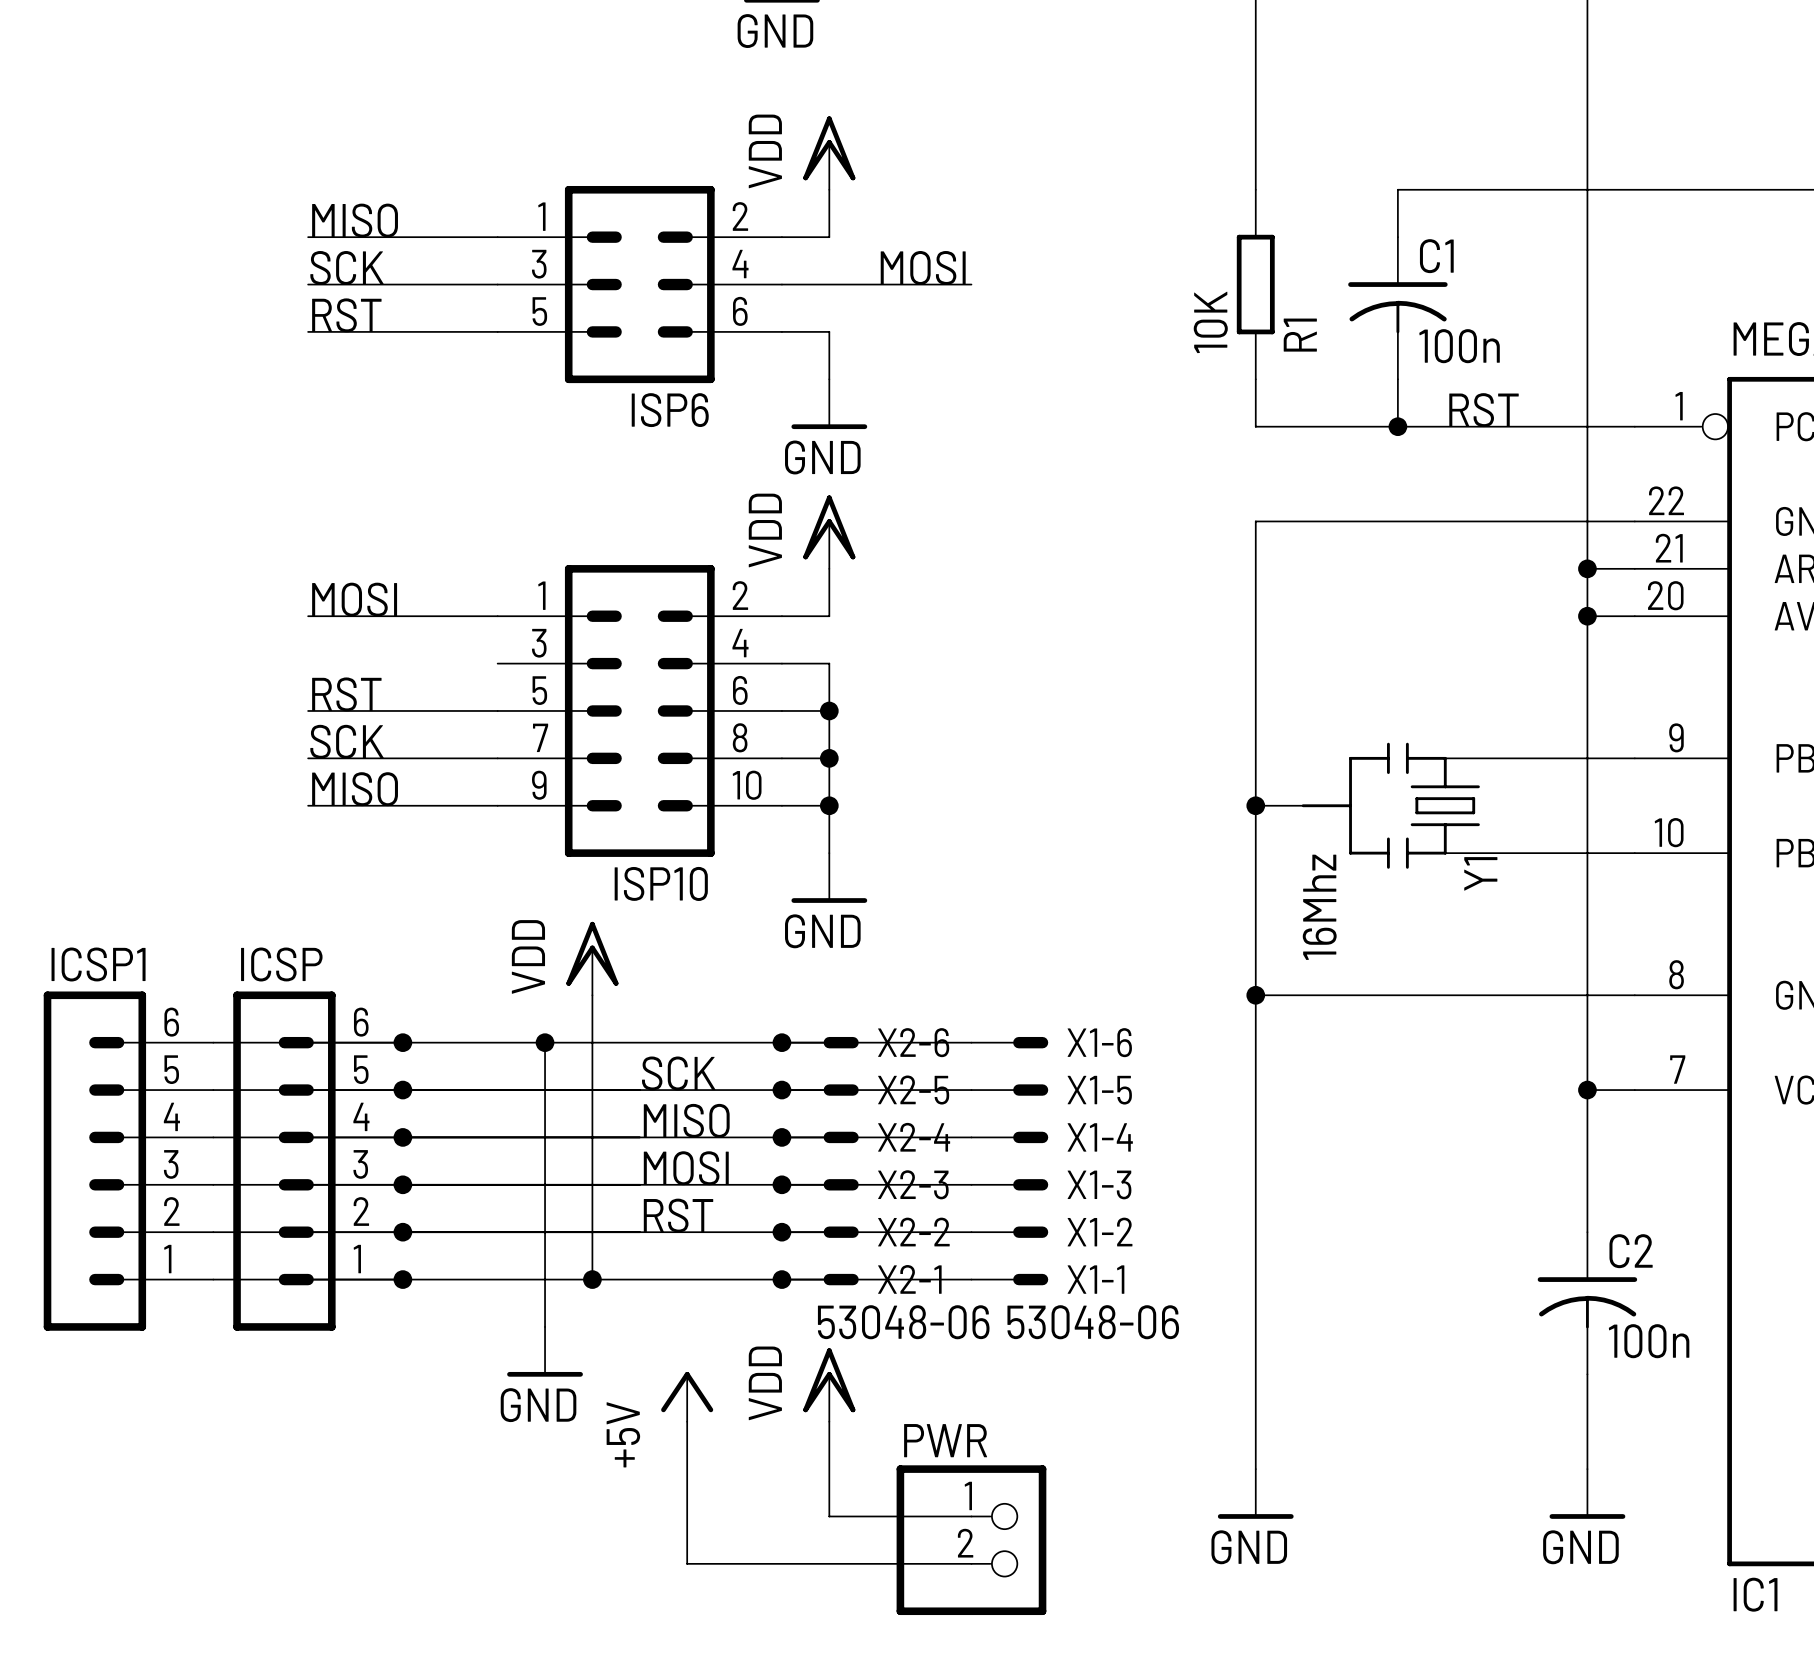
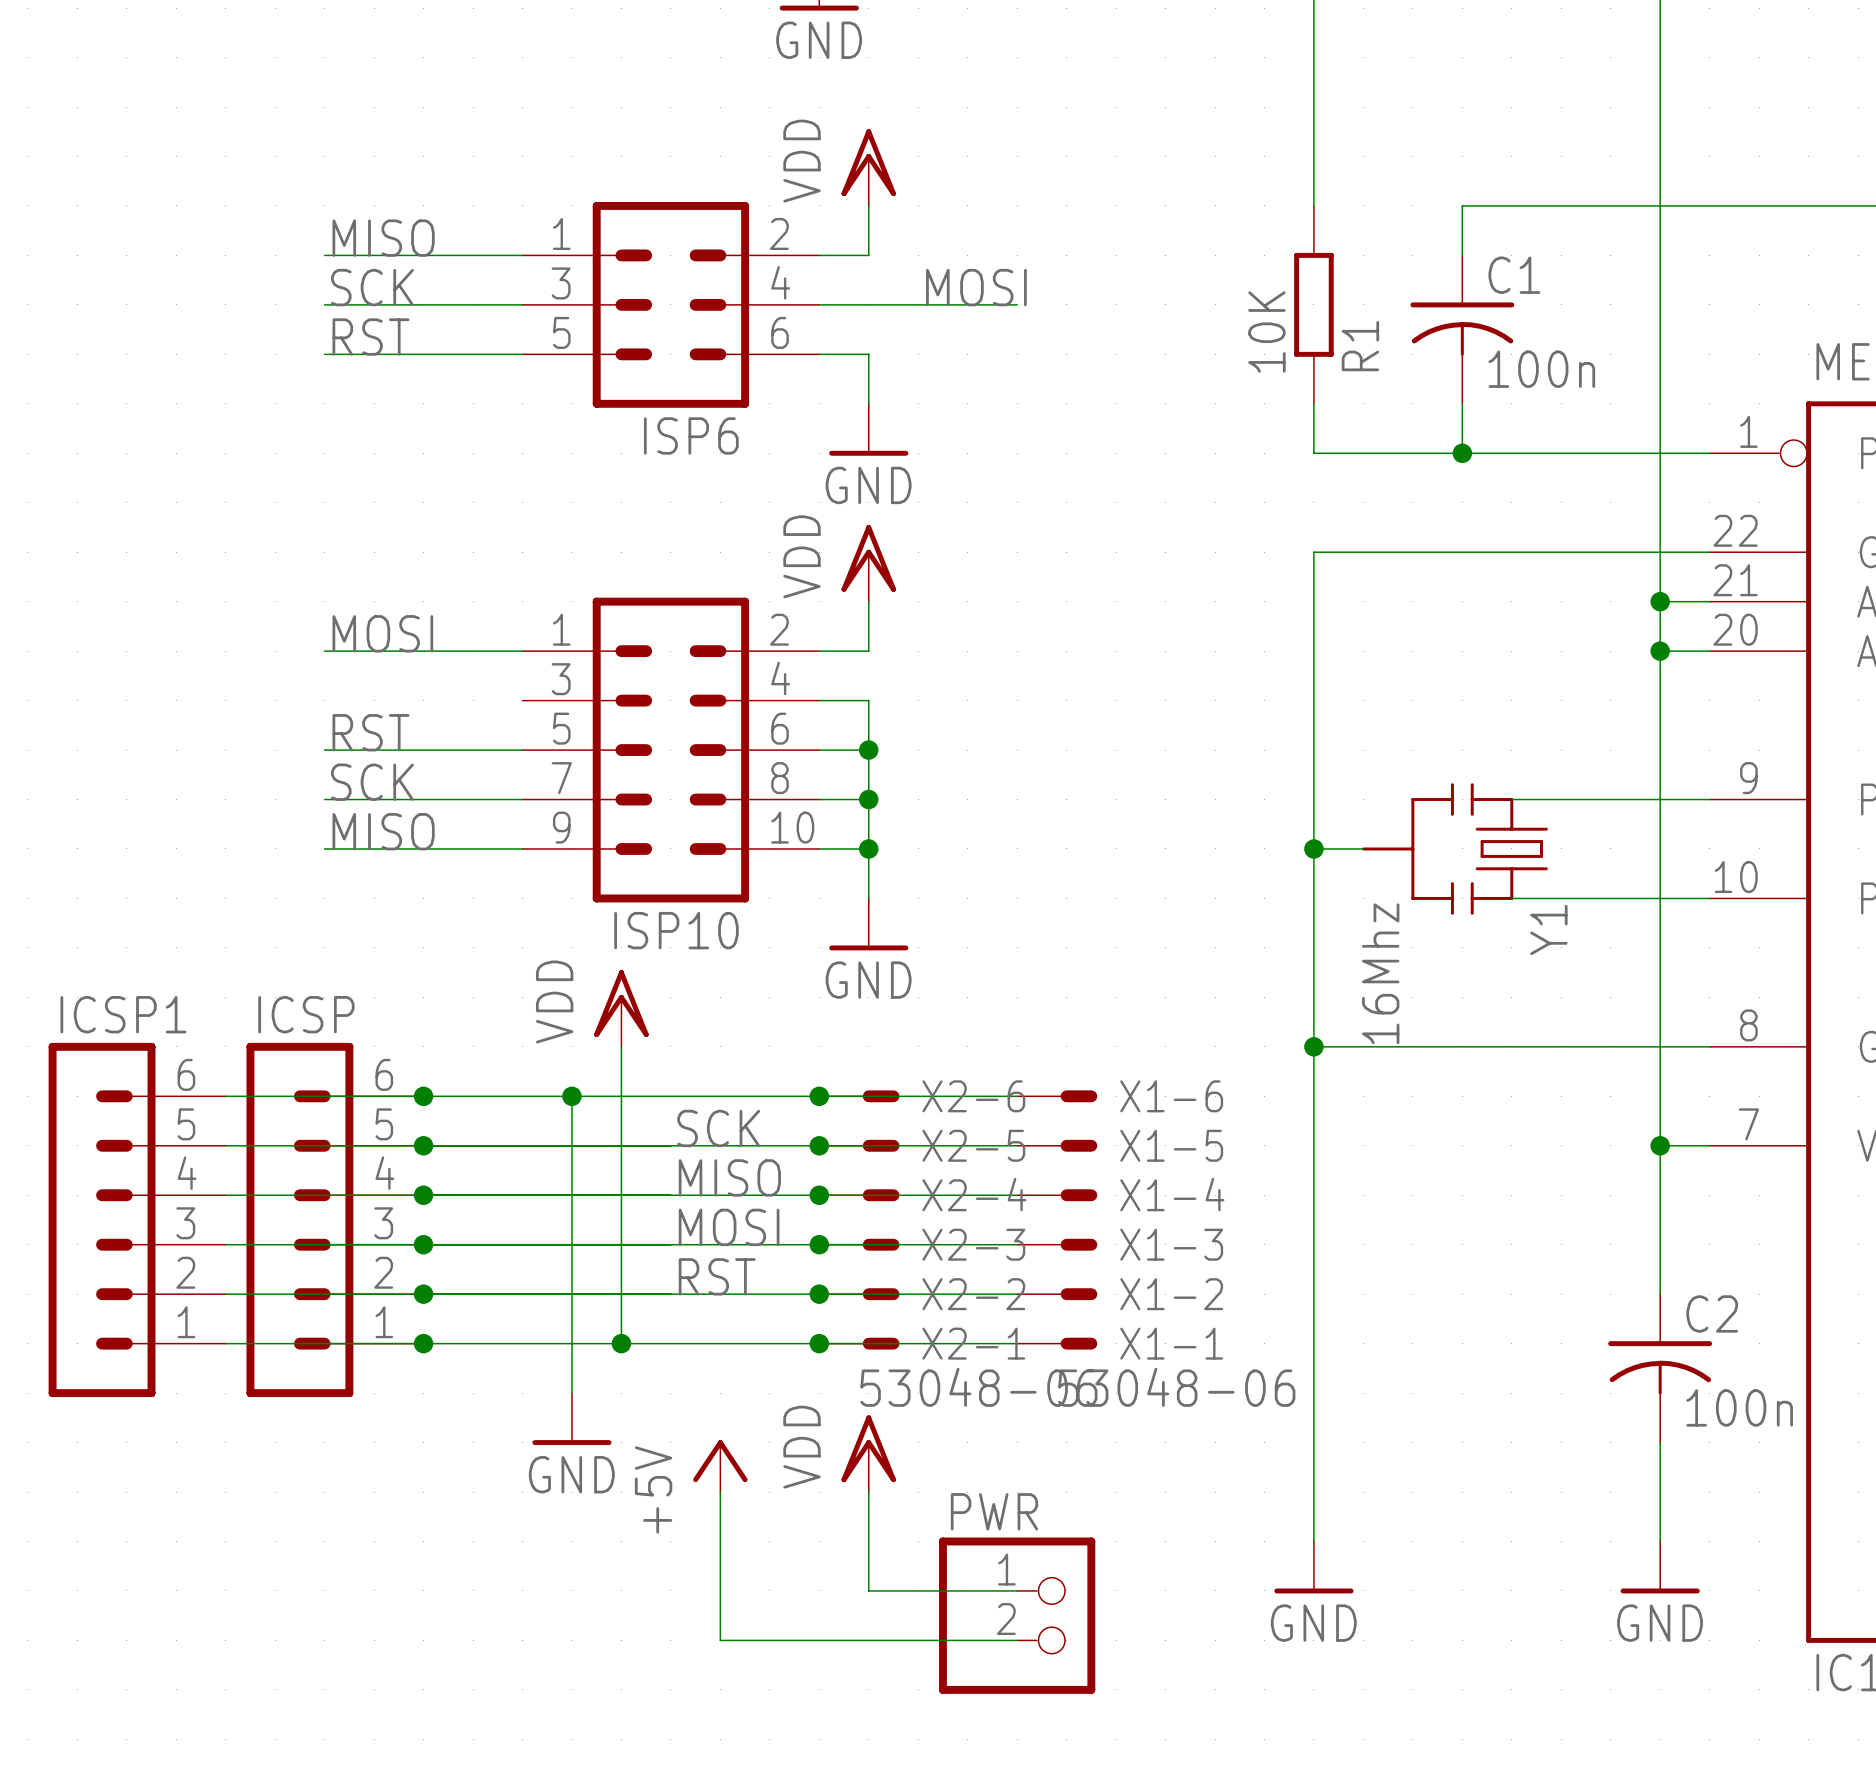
label: RST (1484, 410) -> none

